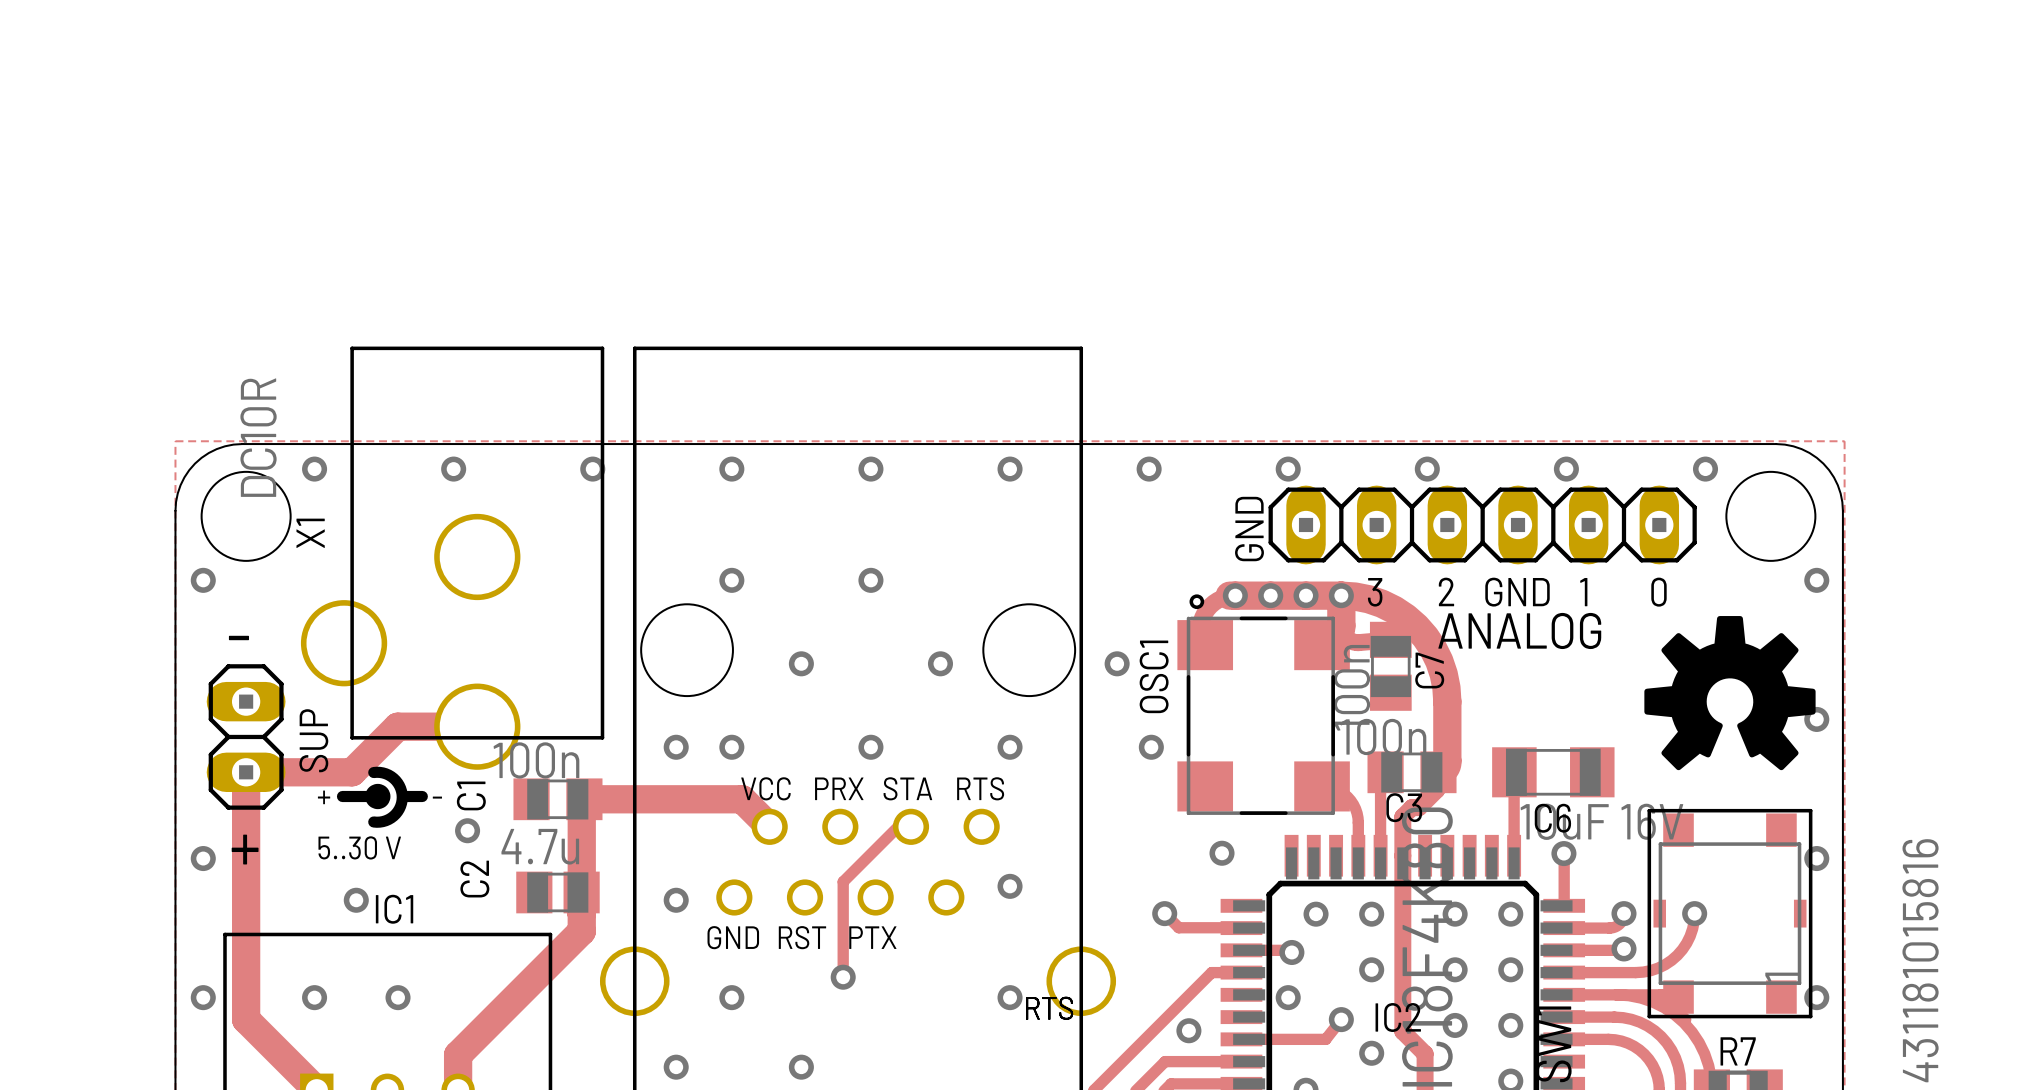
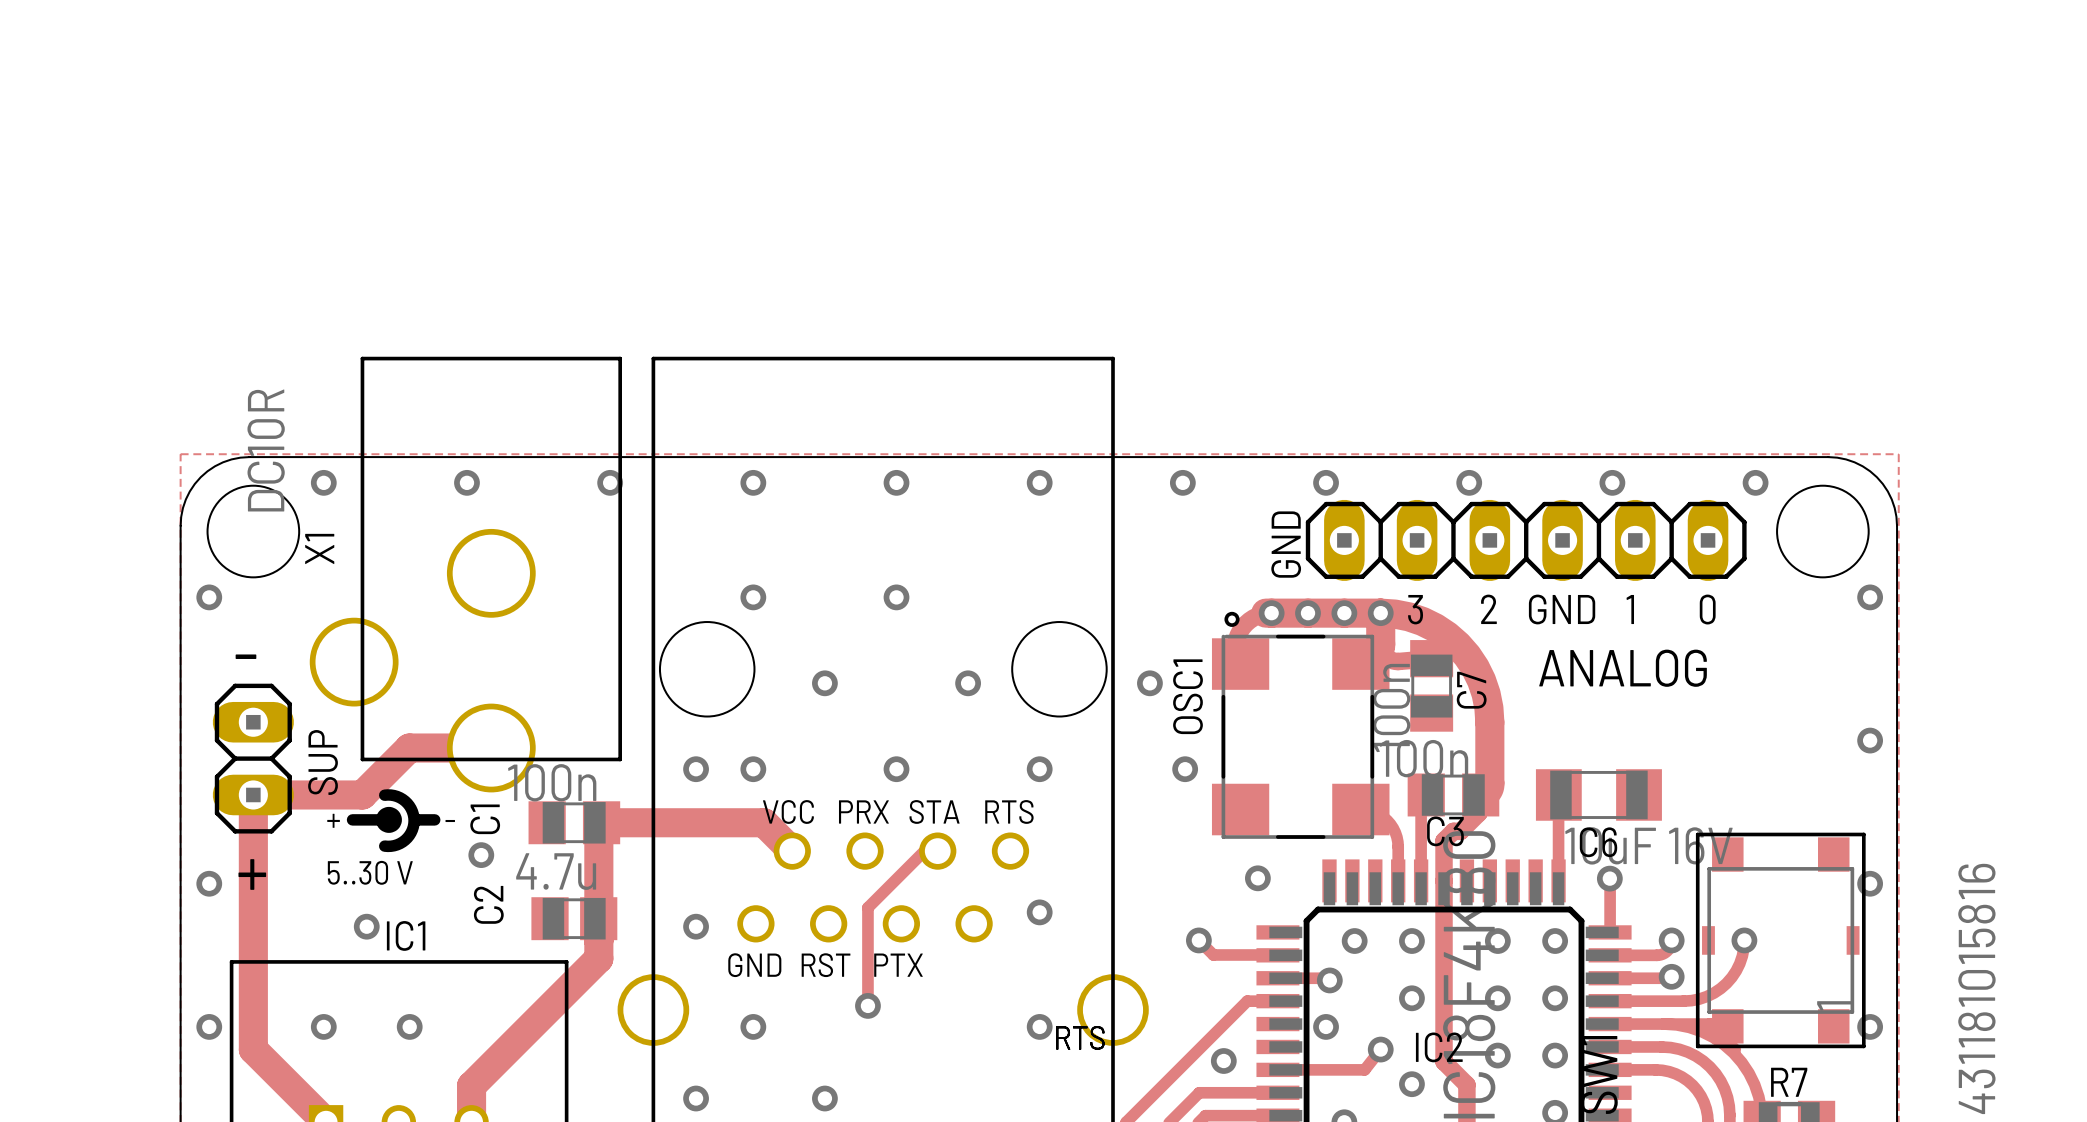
drawing: [1644, 616, 1816, 771] -> none
text: ANALOG (1519, 630) -> none
ANALOG name: none -> ANALOG (1622, 668)

